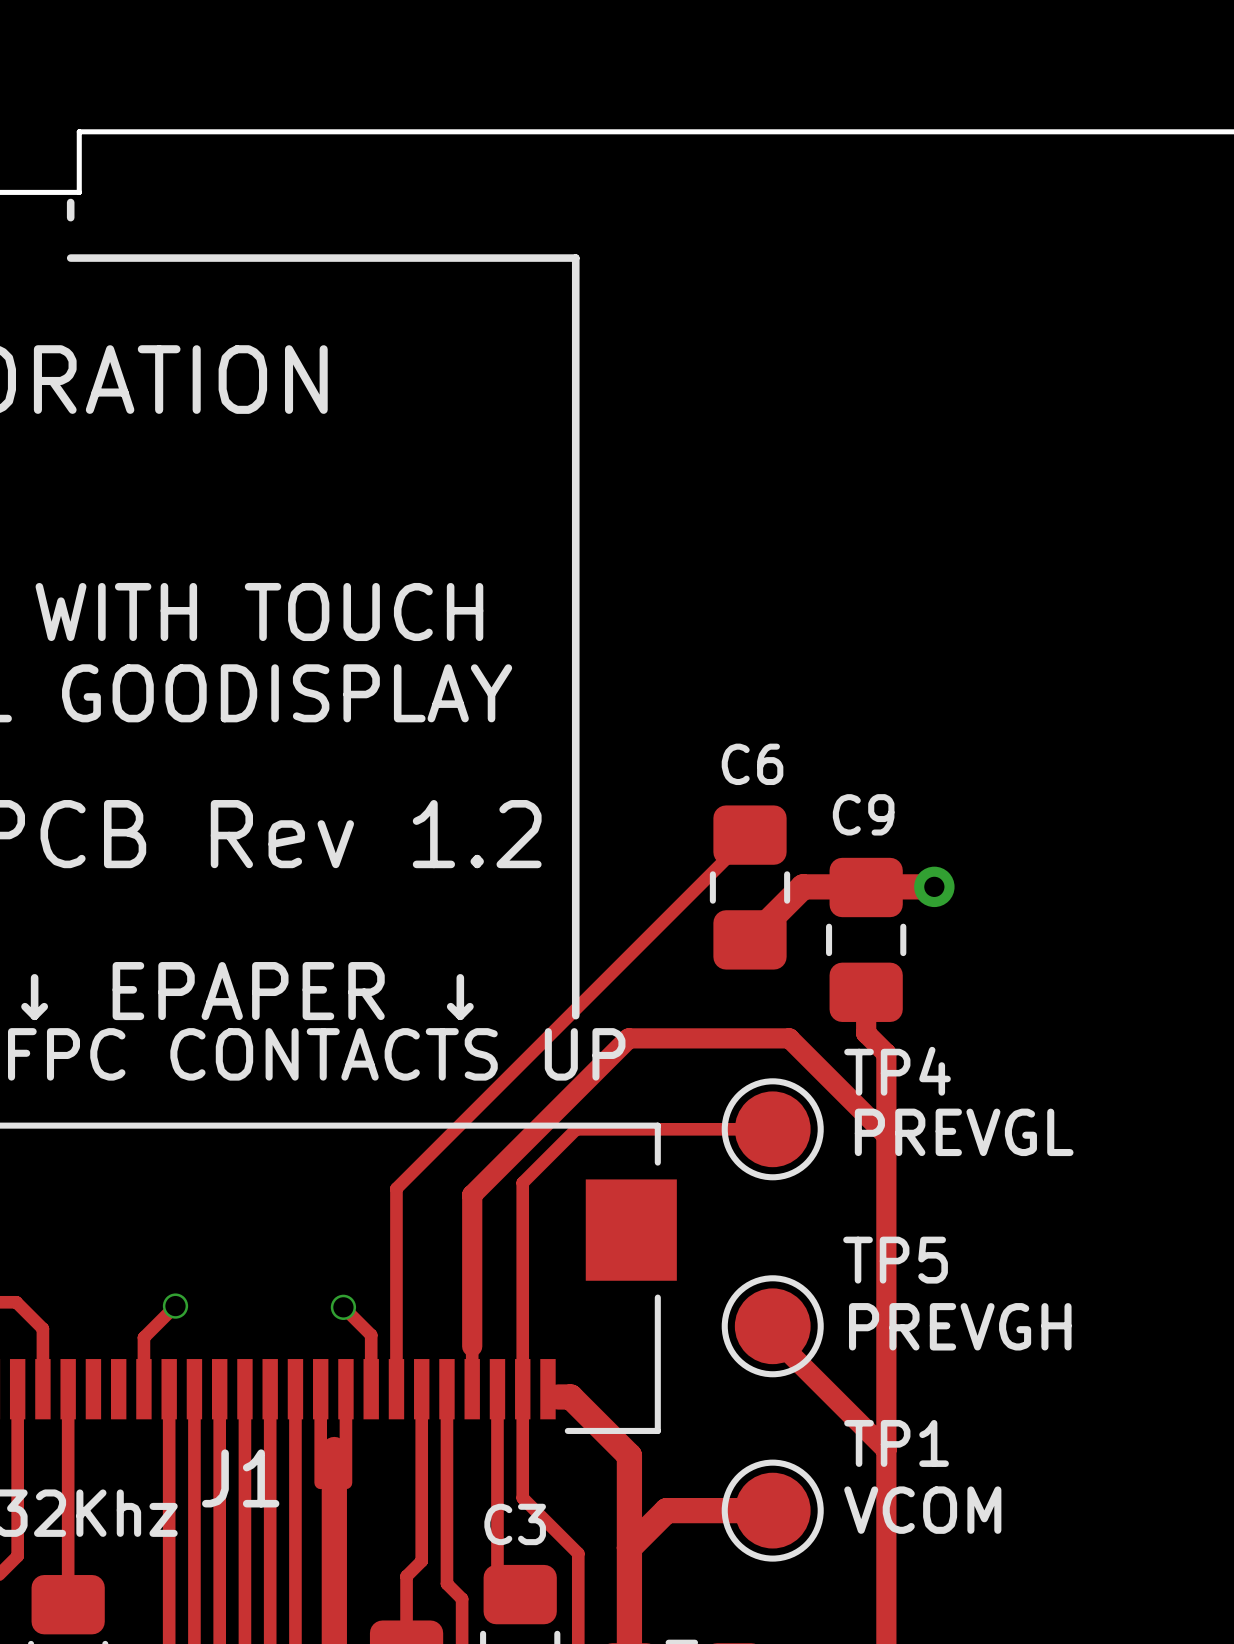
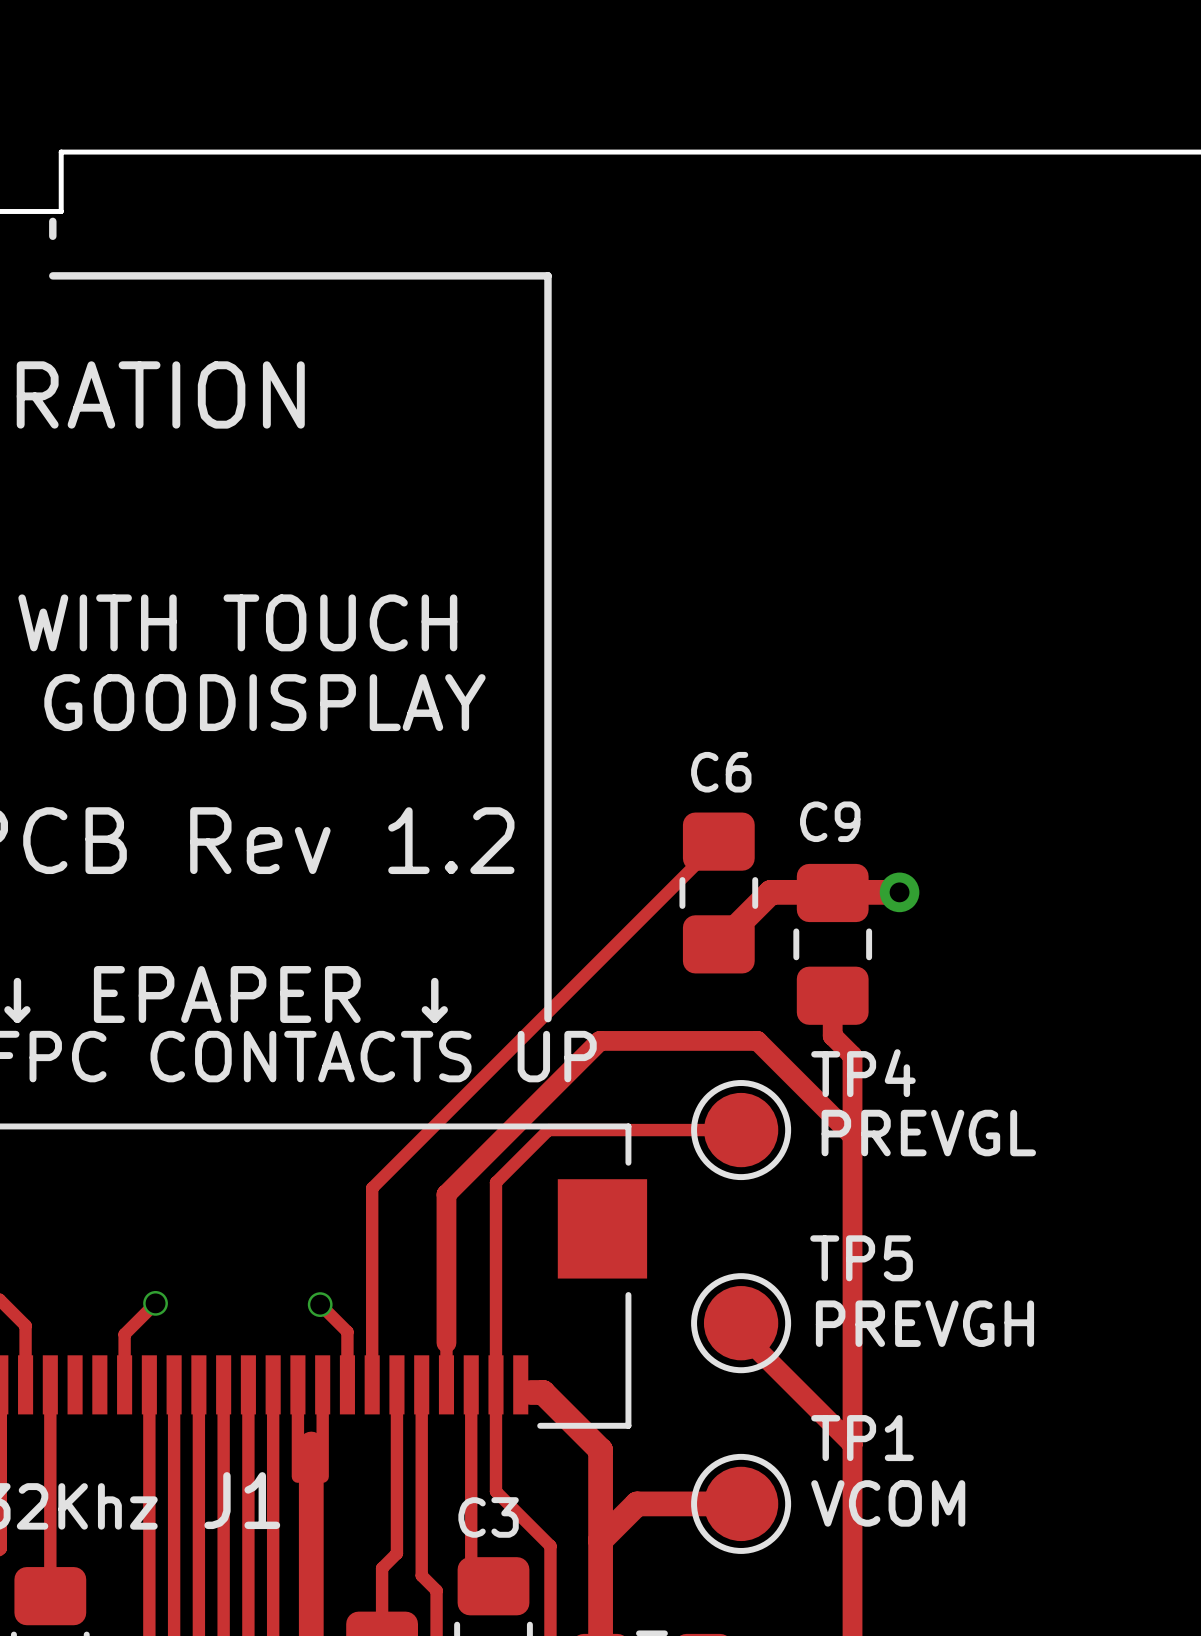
J1 name position: J1 (240, 1478) -> J1 (242, 1500)

